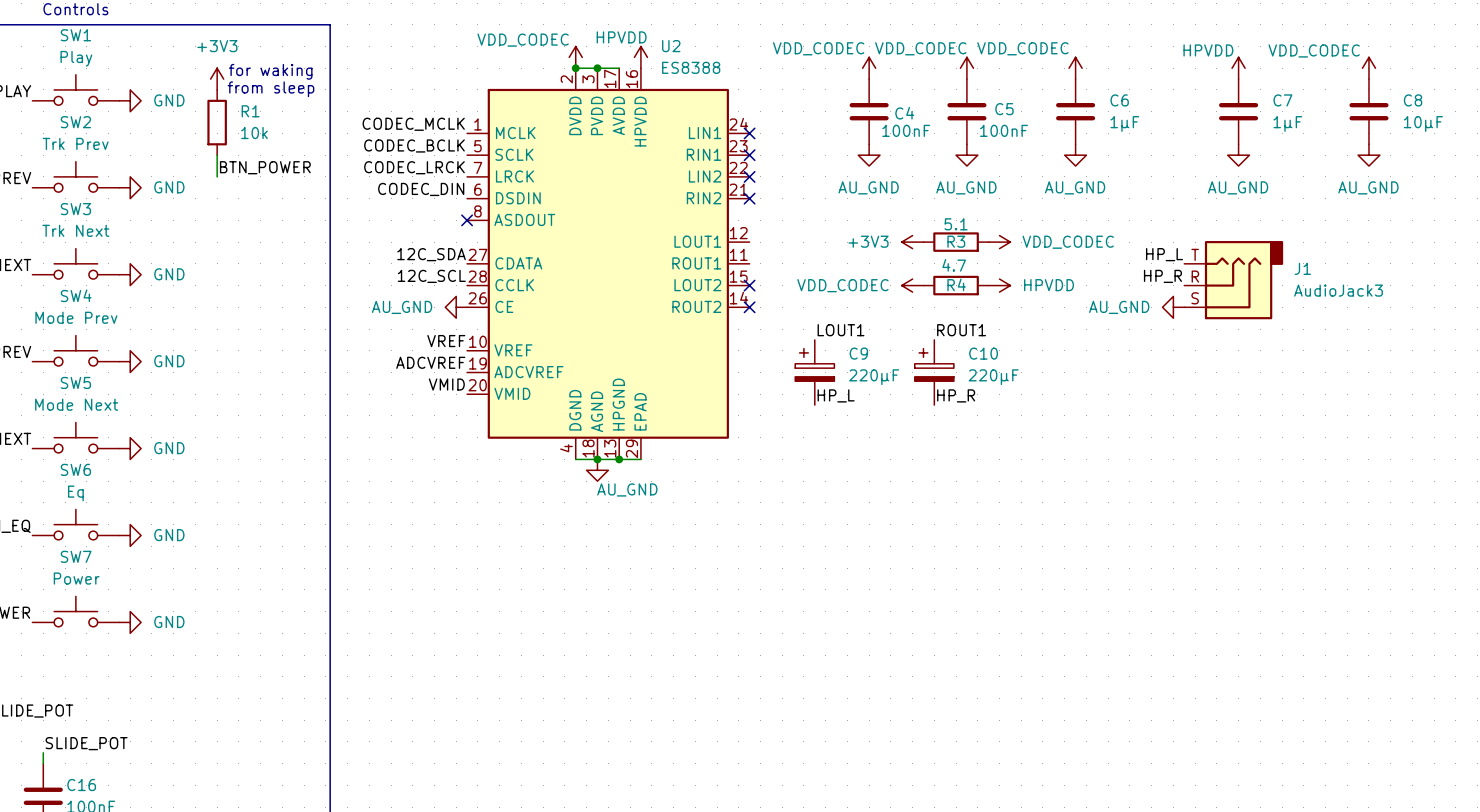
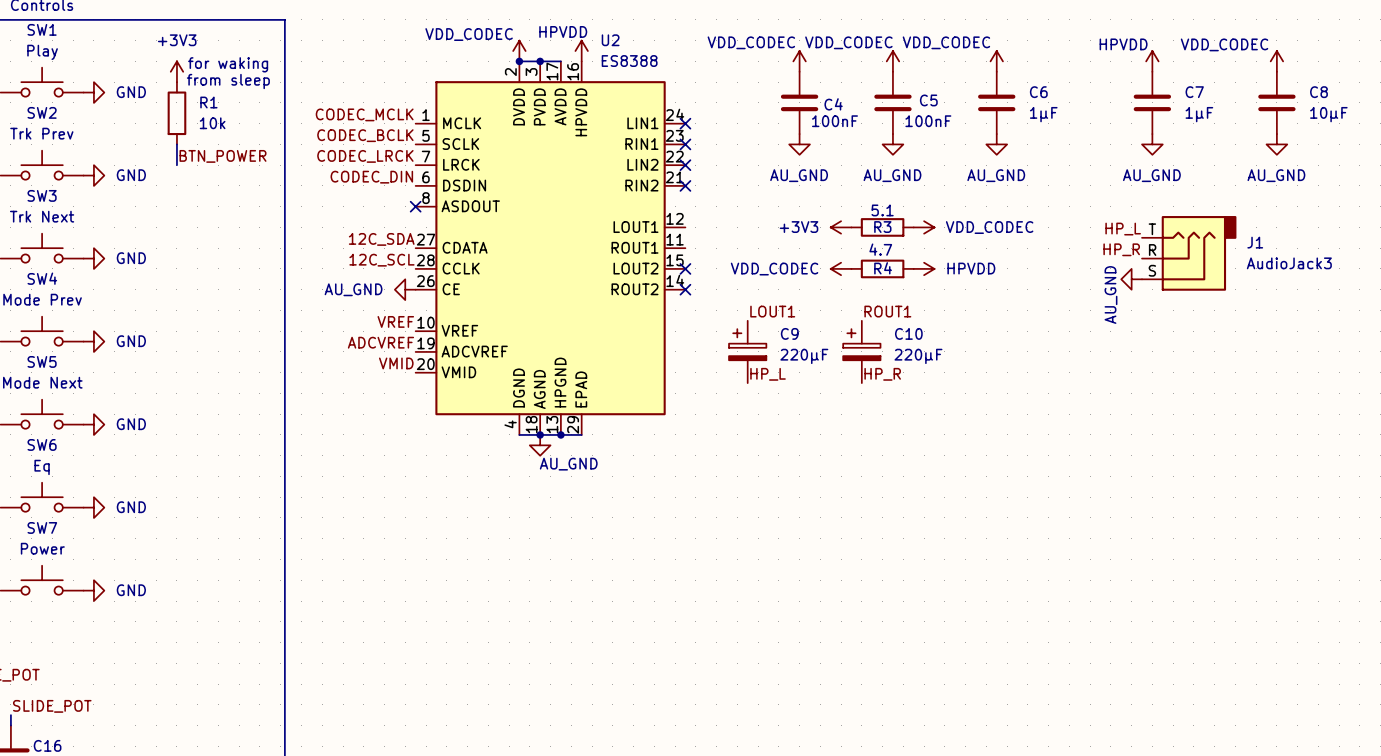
label position: HP_L (1164, 254) -> HP_L (1123, 229)
label position: HP_R (1162, 276) -> HP_R (1121, 249)
J1 position: (1233, 280) -> (1189, 253)
power symbol text rotation: 0° (1119, 307) -> 90° counterclockwise (1110, 295)
power symbol position: AU_GND (1173, 307) -> AU_GND (1131, 279)

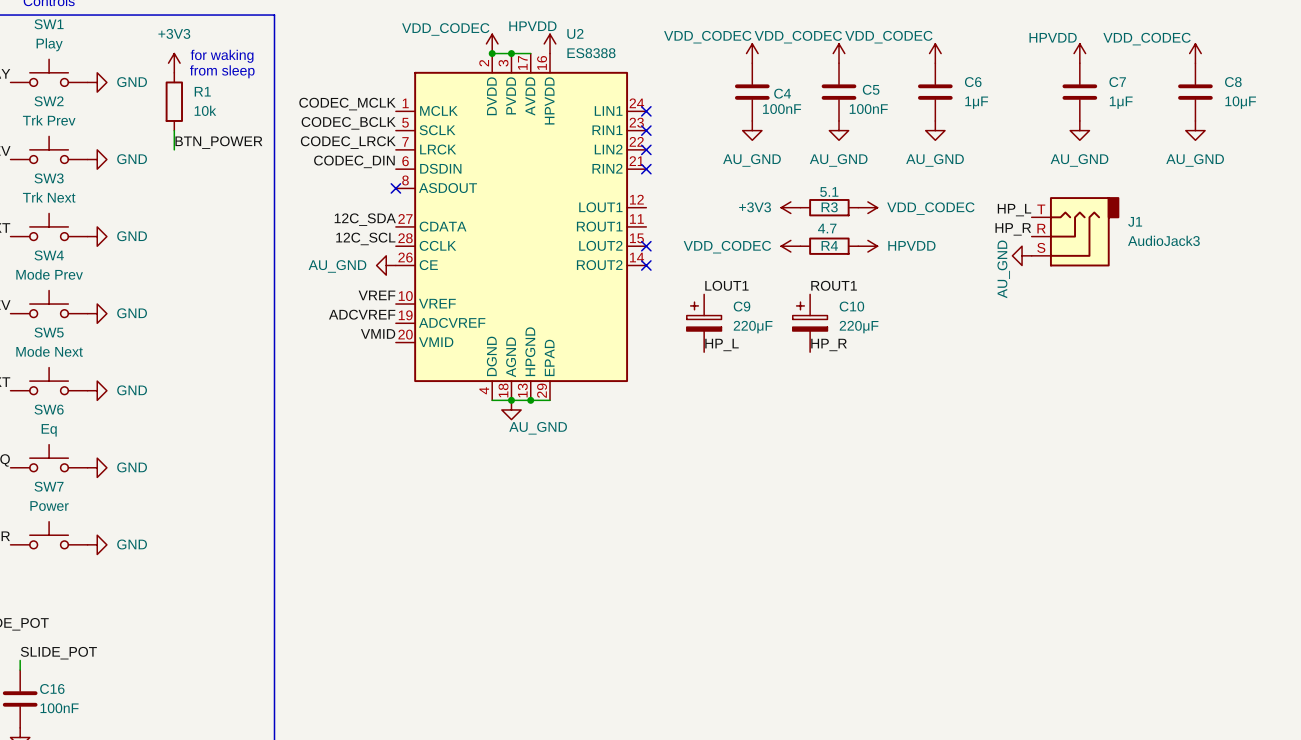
label position: HP_L (1123, 229) -> HP_L (1014, 210)
label position: HP_R (1121, 249) -> HP_R (1013, 229)
J1 position: (1189, 253) -> (1075, 231)
power symbol position: AU_GND (1131, 279) -> AU_GND (1022, 255)

